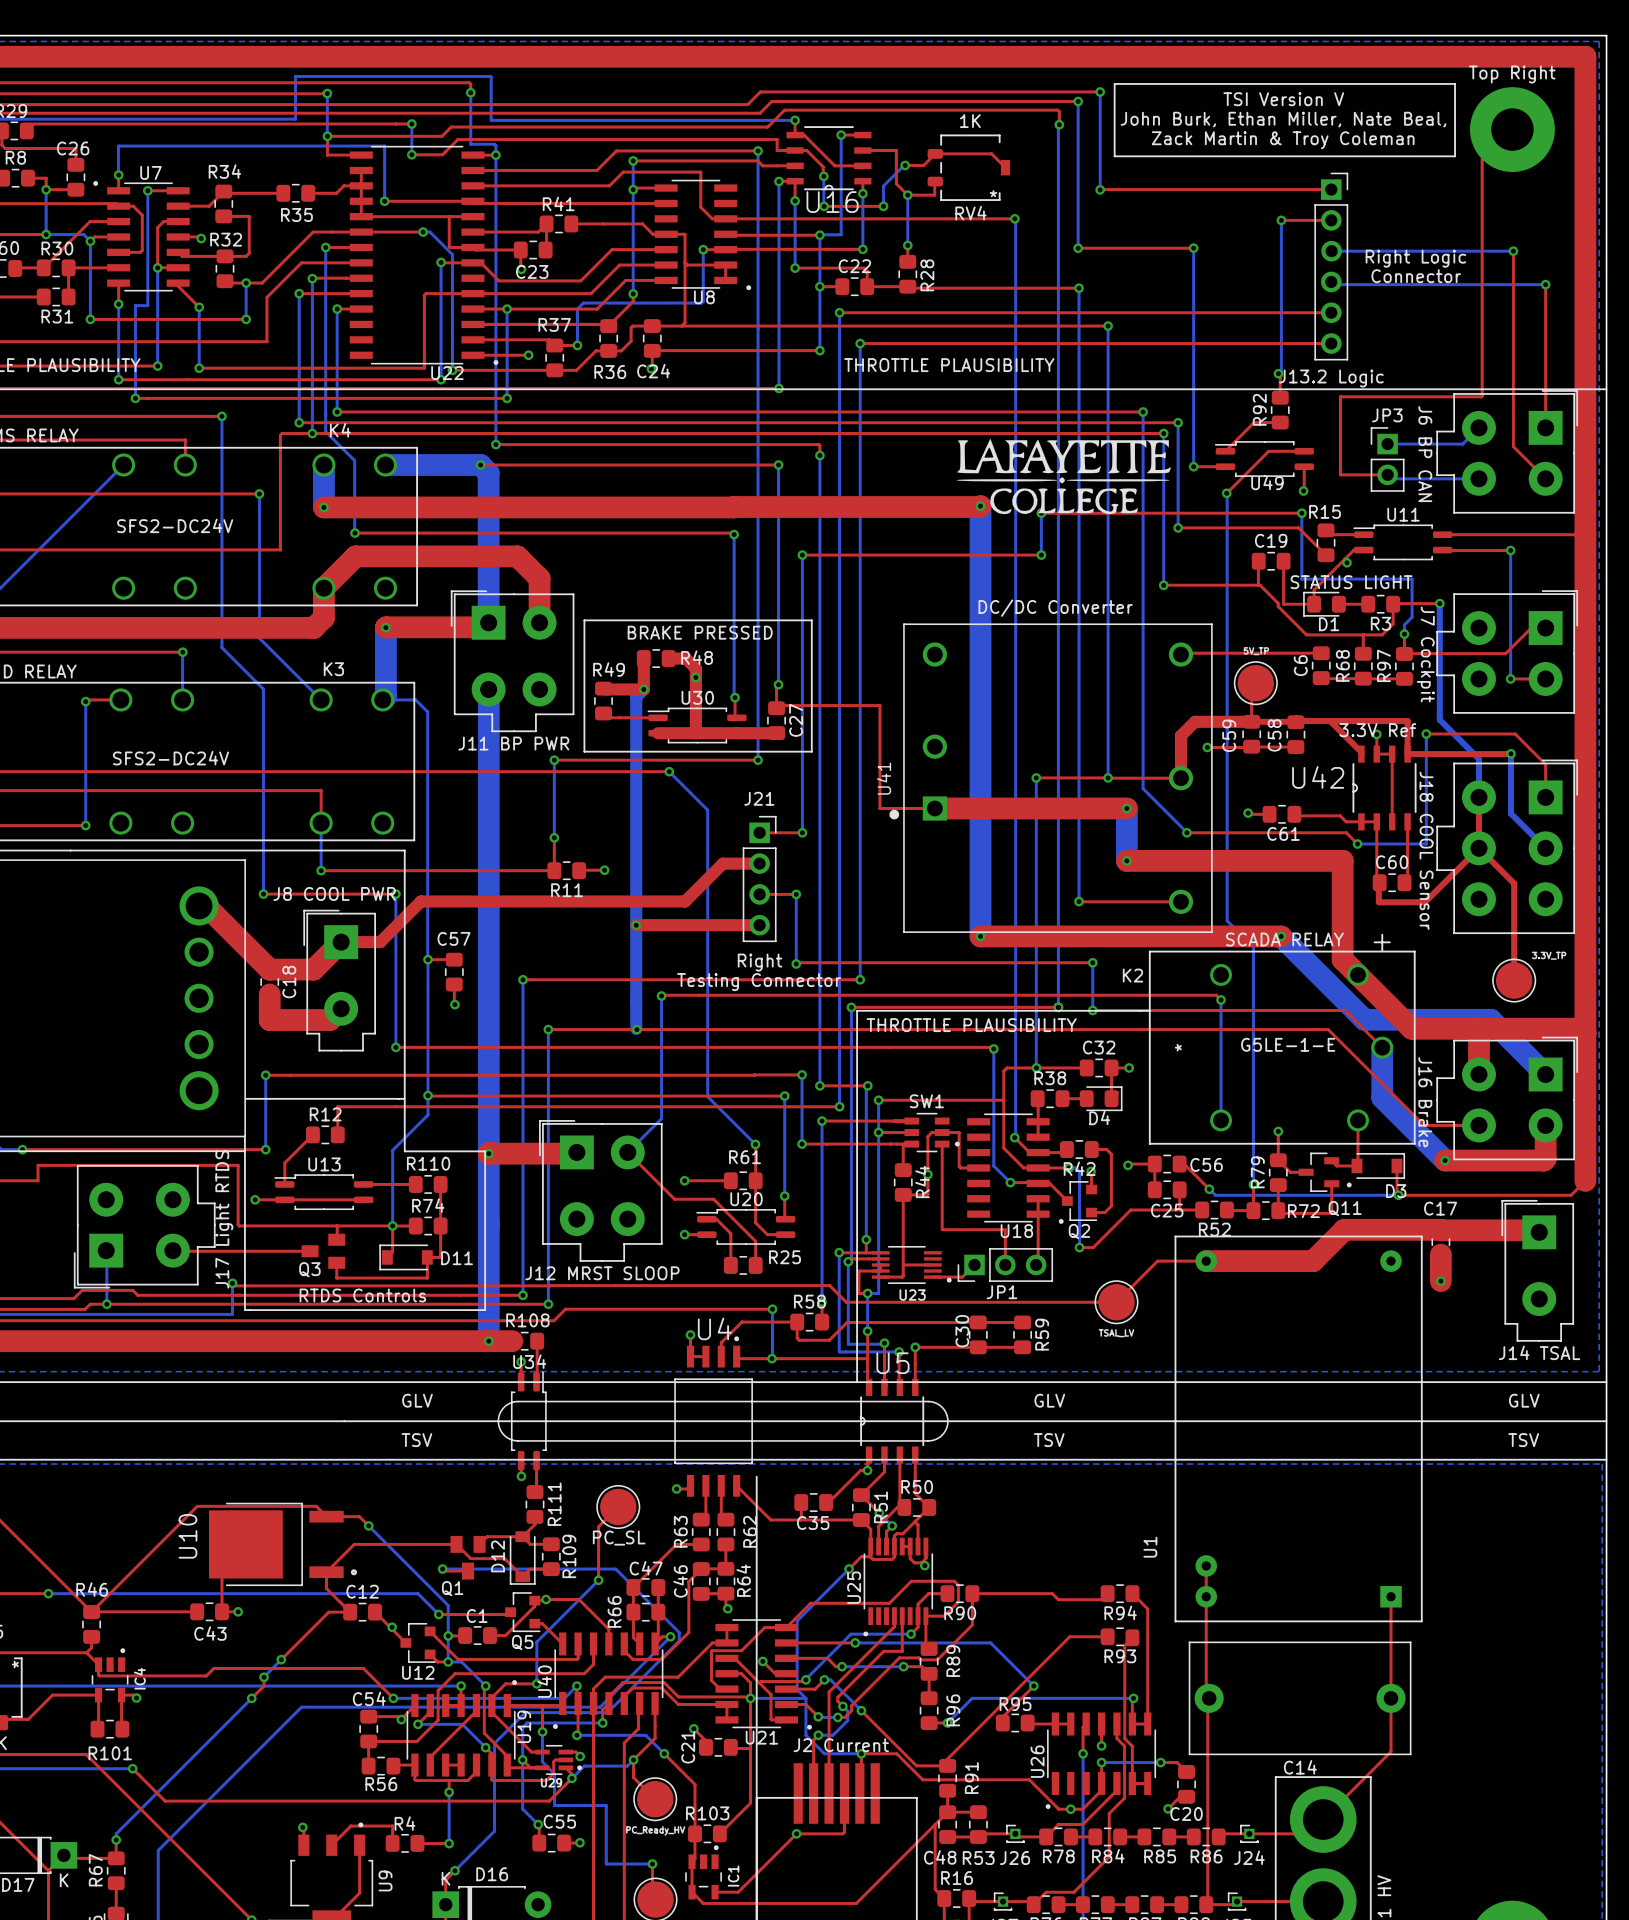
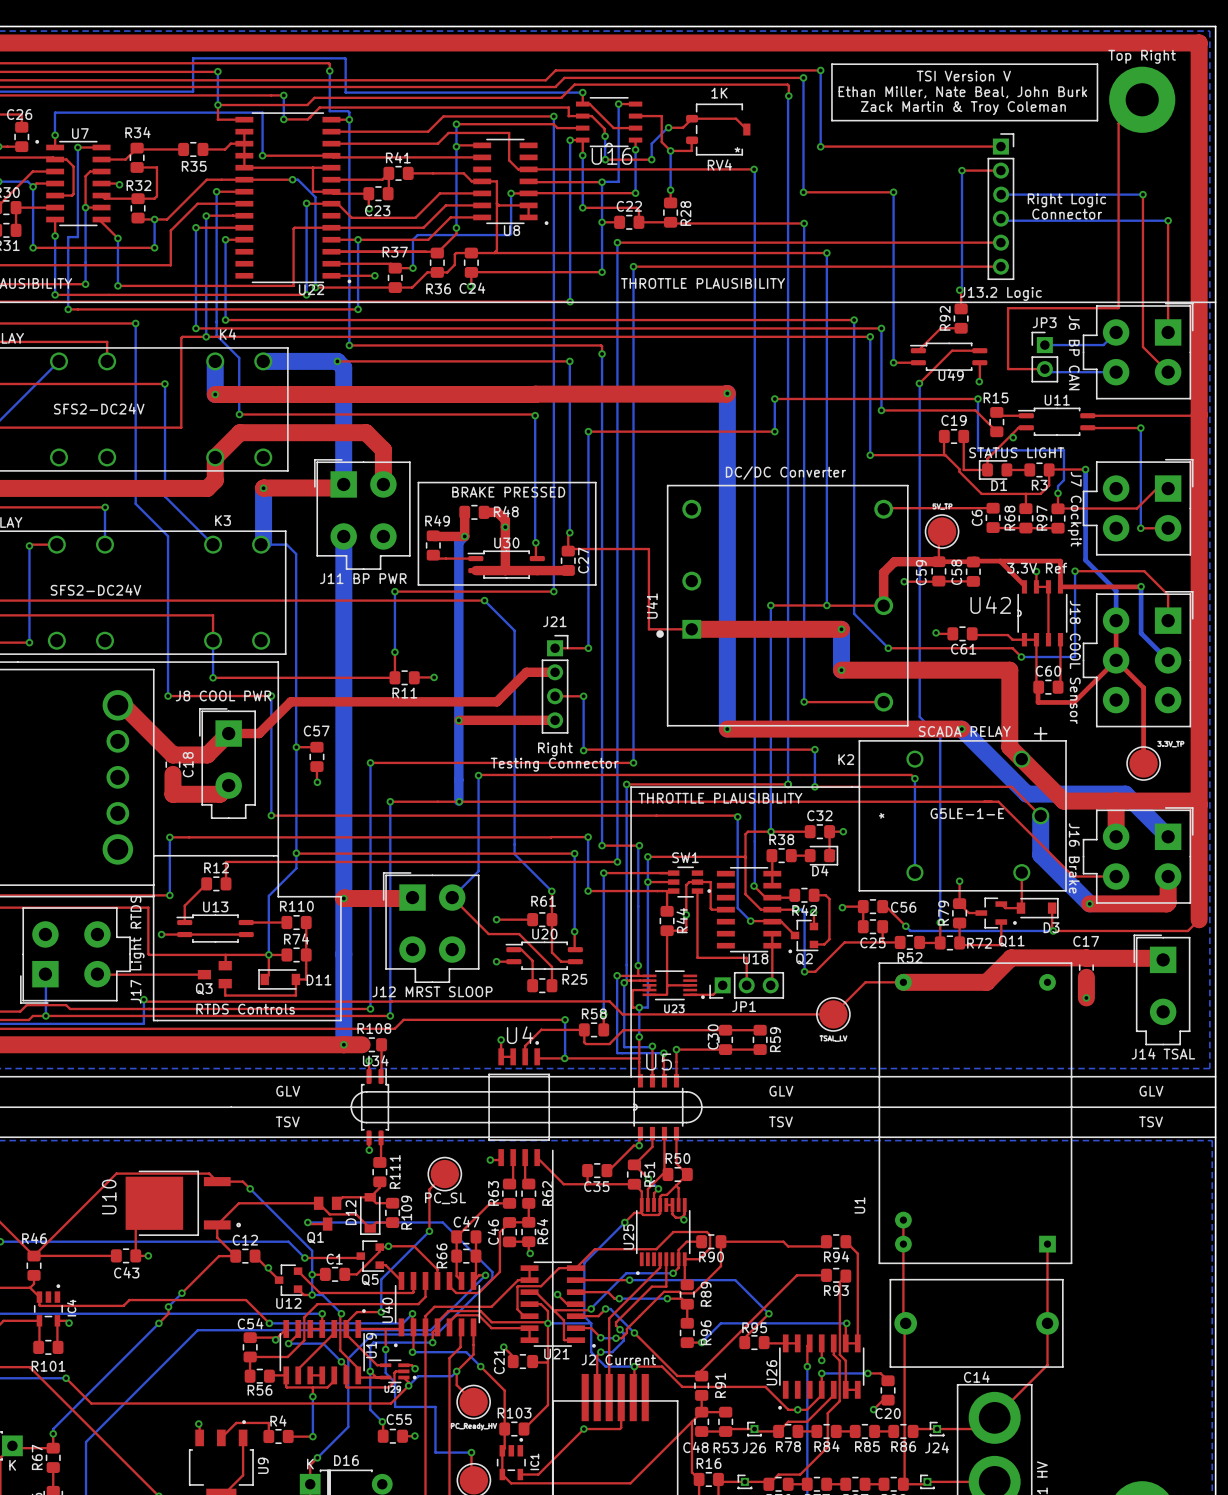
text: John Burk, Ethan Miller, Nate Beal, (1283, 119) -> Ethan Miller, Nate Beal, John Burk (962, 92)
drawing: [956, 438, 1171, 515] -> none

